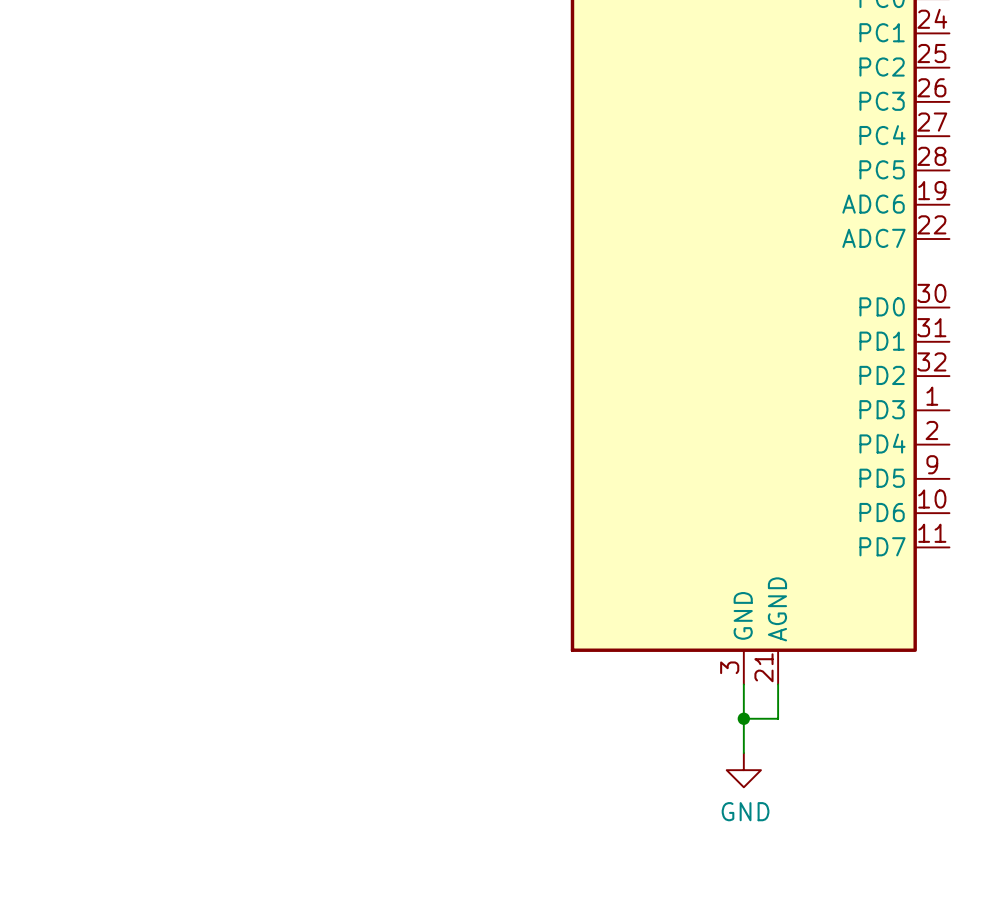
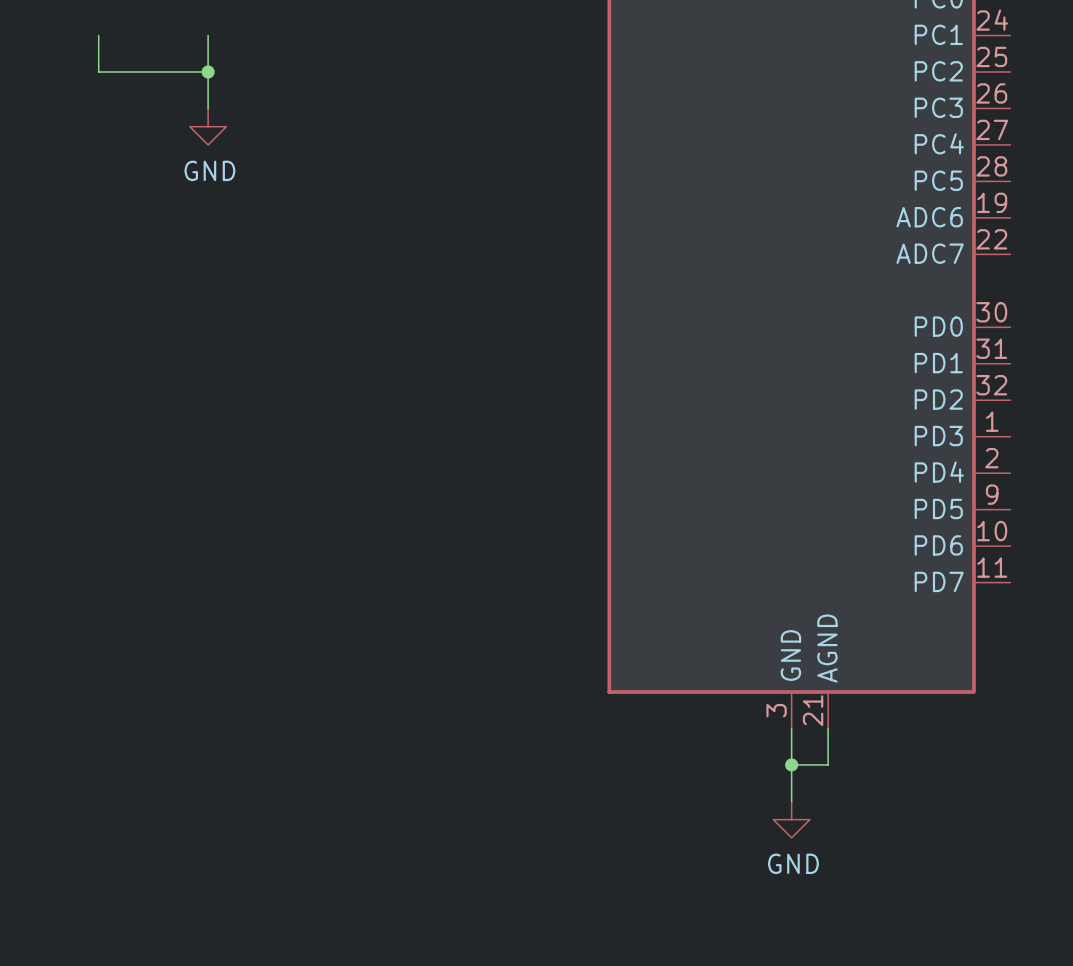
wire: none -> (98, 35) (98, 72) (208, 72)
wire: none -> (208, 35) (208, 108)
junction: none -> (208, 72)
power symbol: none -> GND (208, 126)

